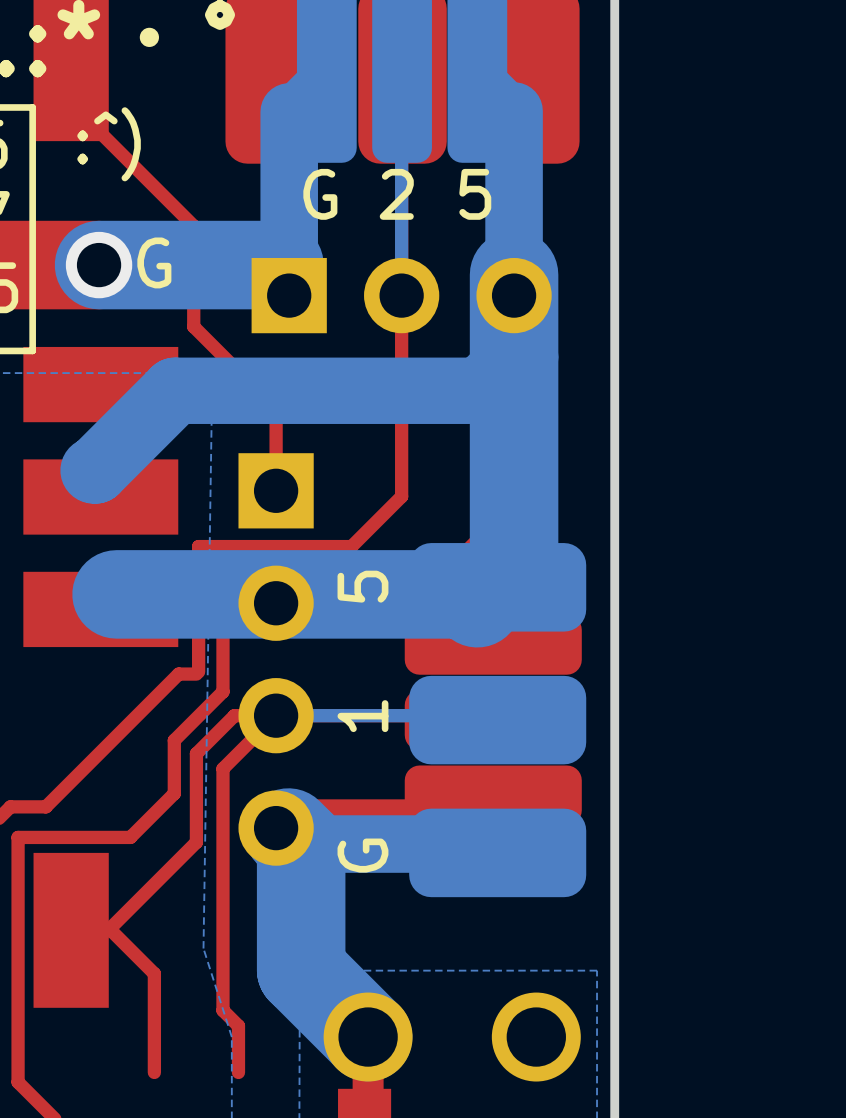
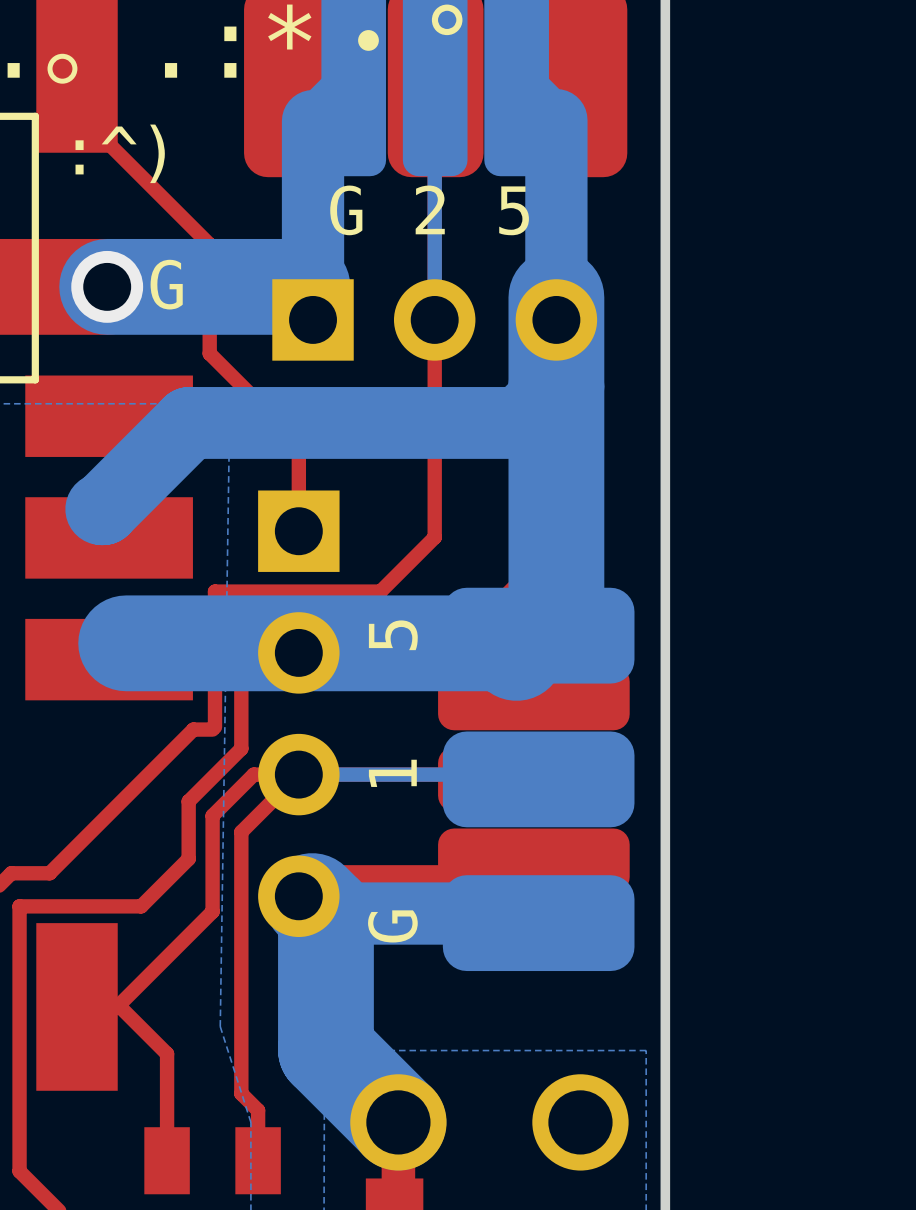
part: none -> (212, 1160)

